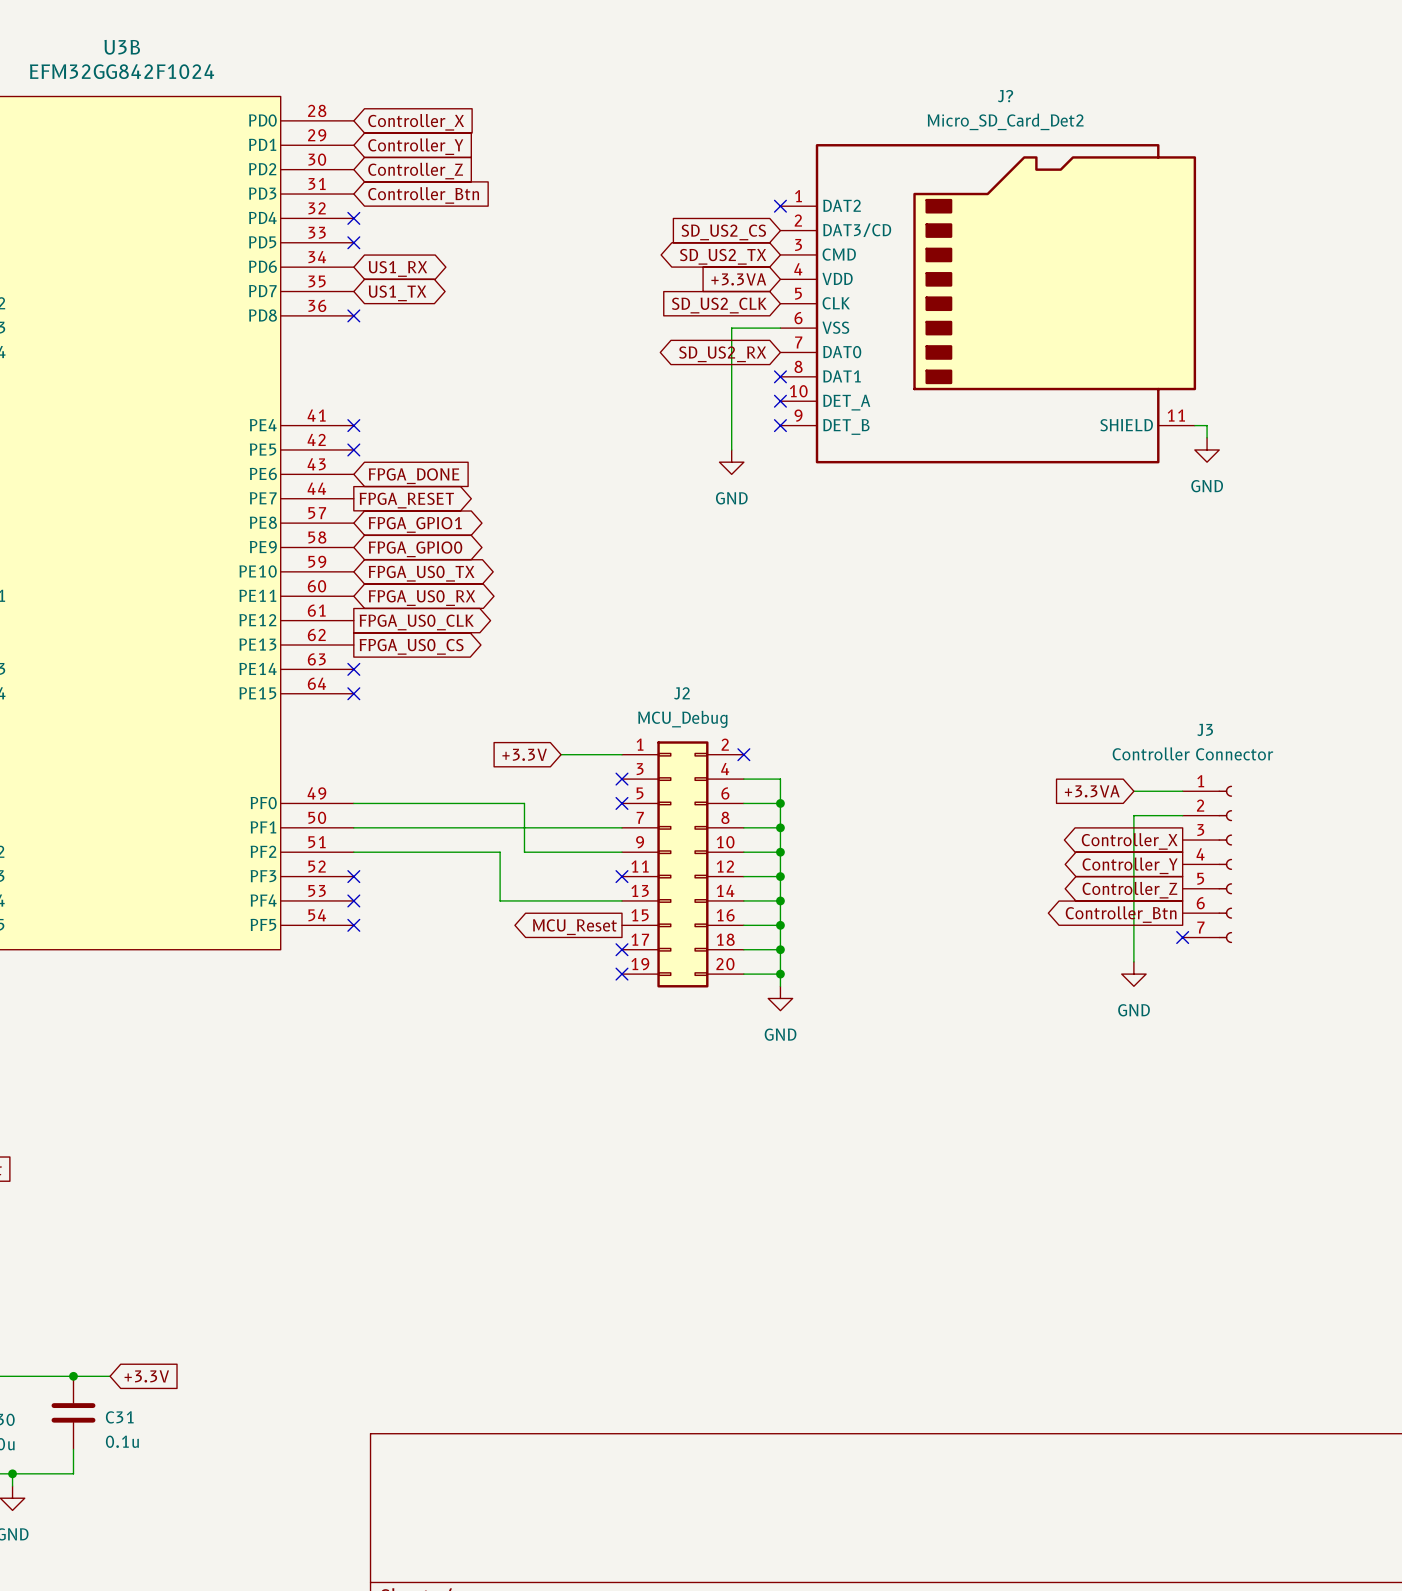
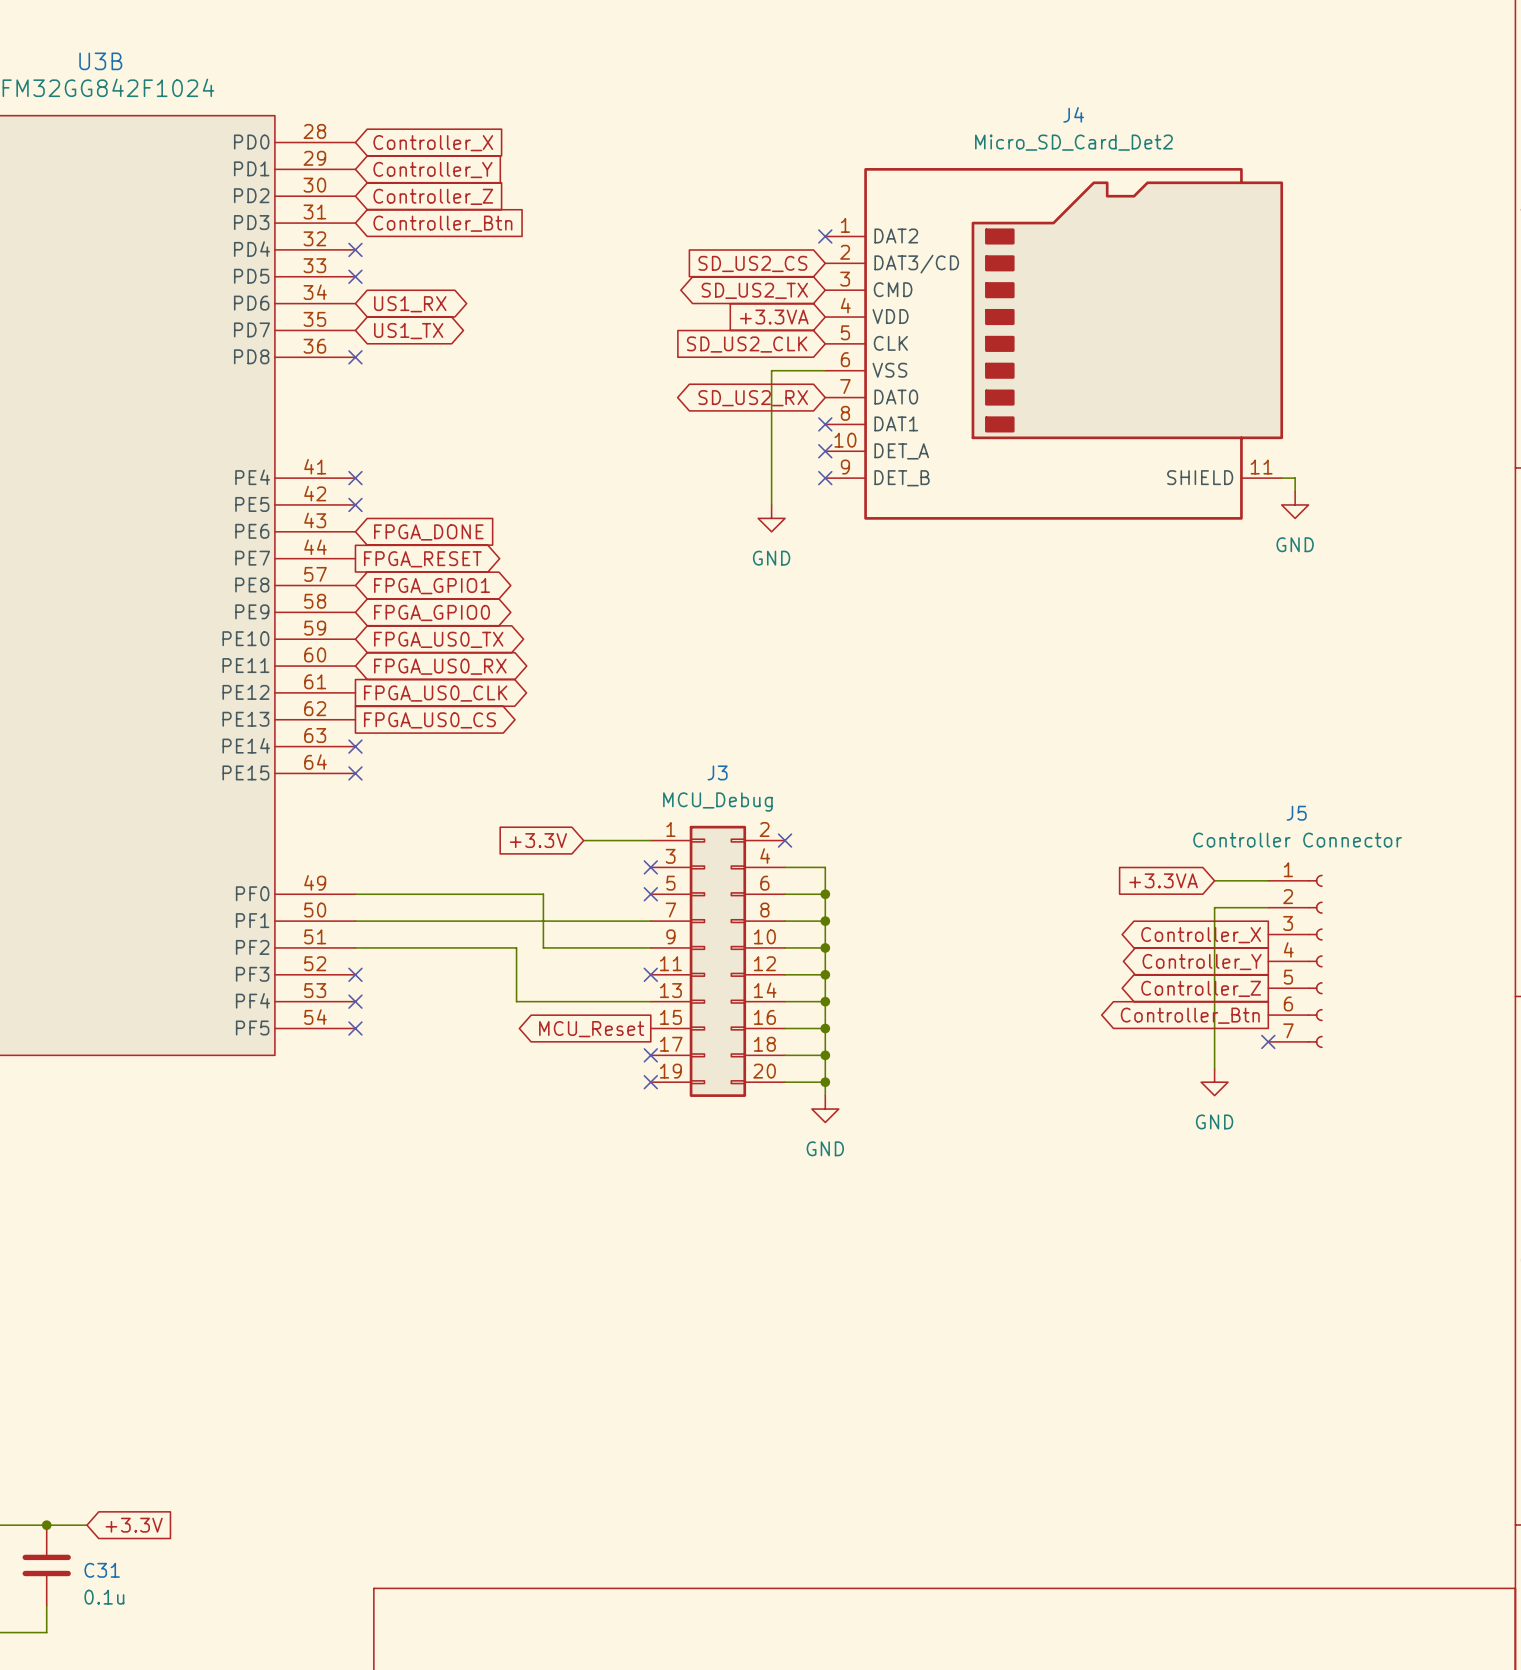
J? name: J? (1005, 96) -> J4 (1073, 114)
J2 name: J2 (681, 693) -> J3 (717, 772)
J3 name: J3 (1205, 729) -> J5 (1296, 813)

